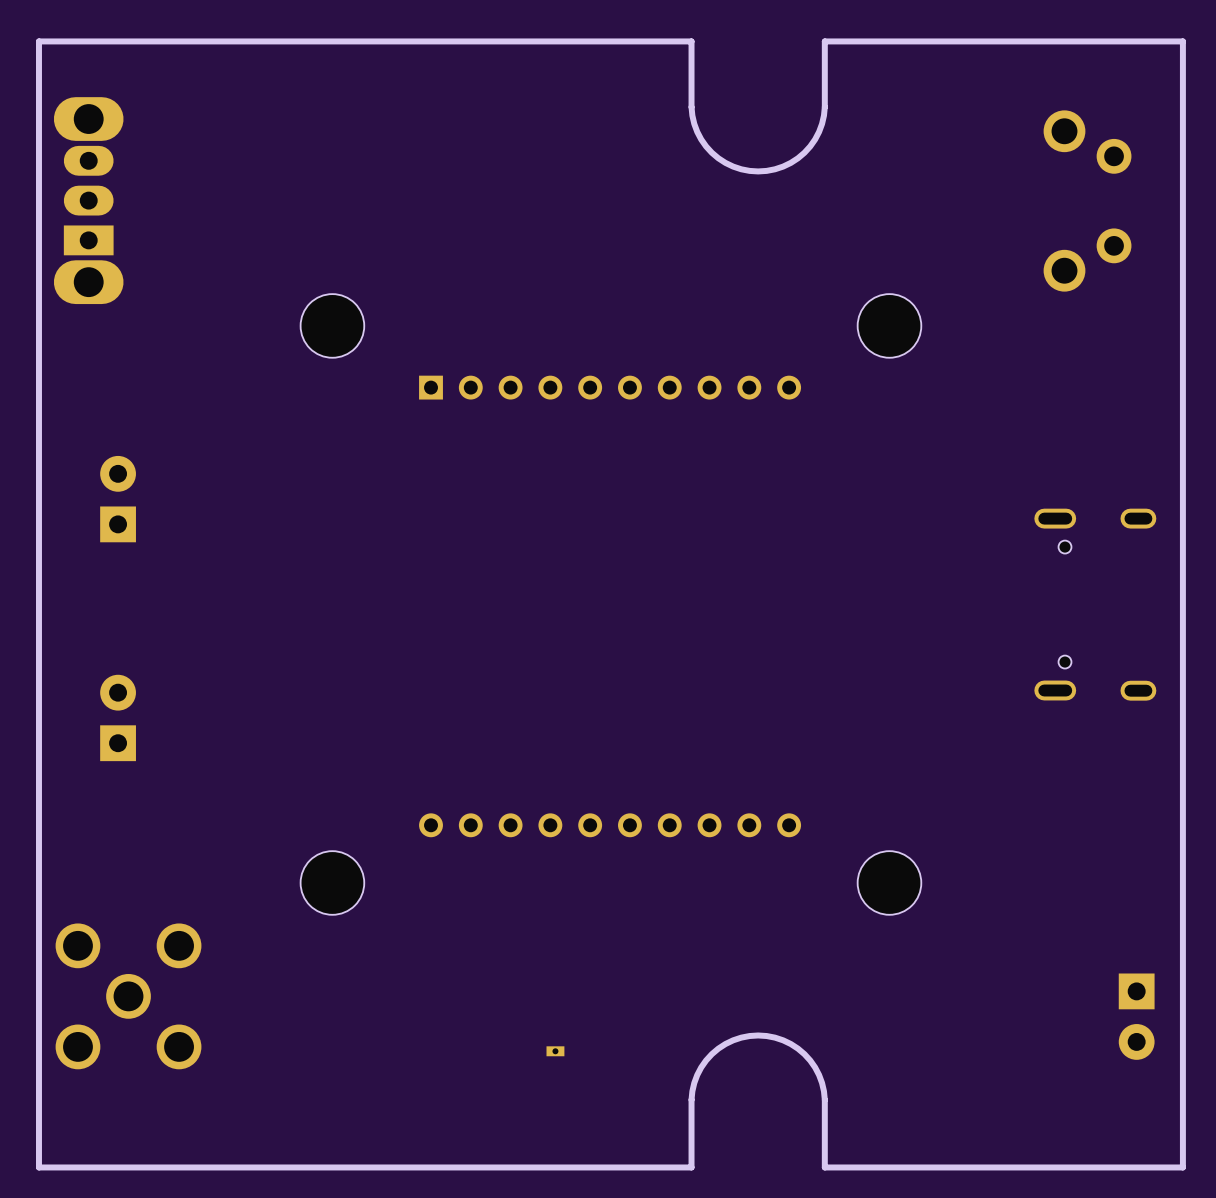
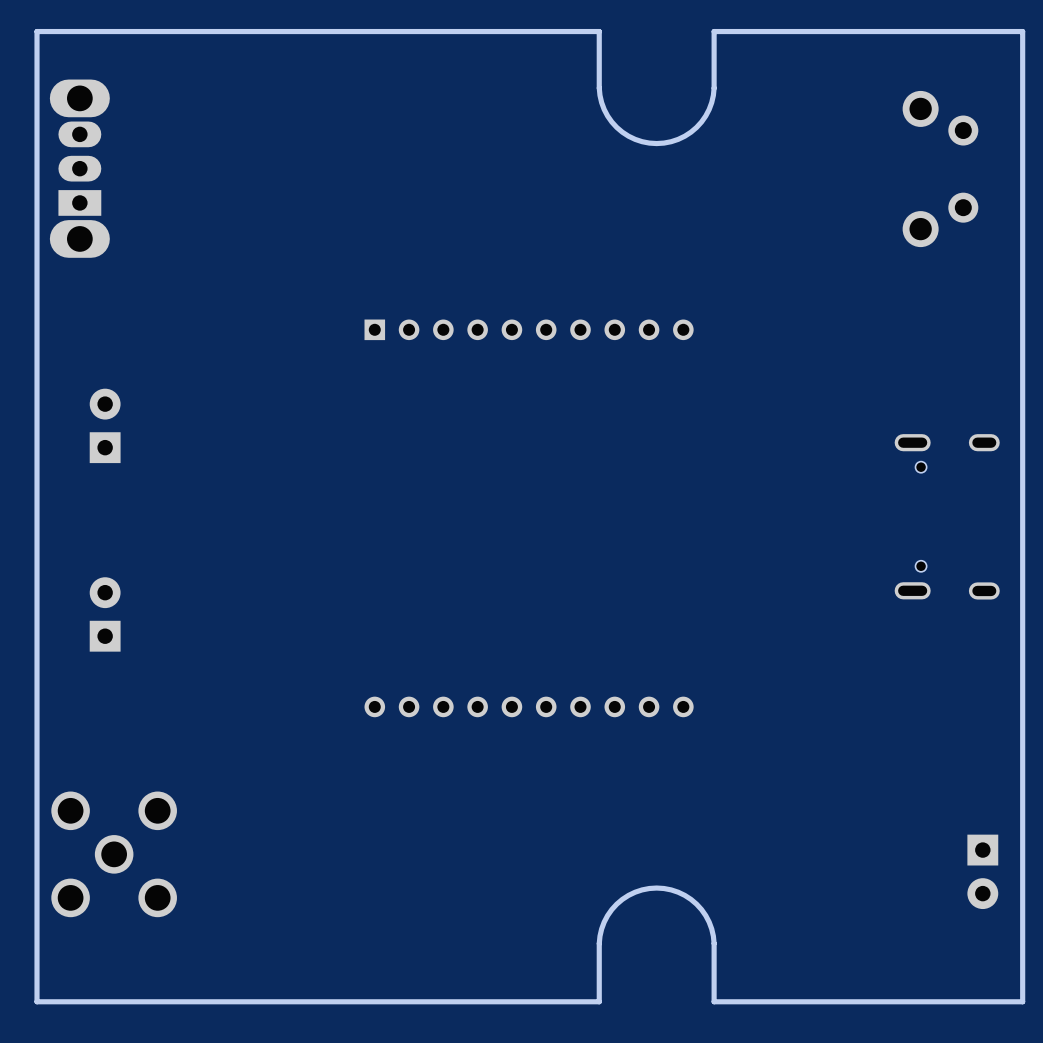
part: (332, 325) -> none
part: (889, 325) -> none
part: (332, 882) -> none
part: (889, 882) -> none
part: (555, 1051) -> none

